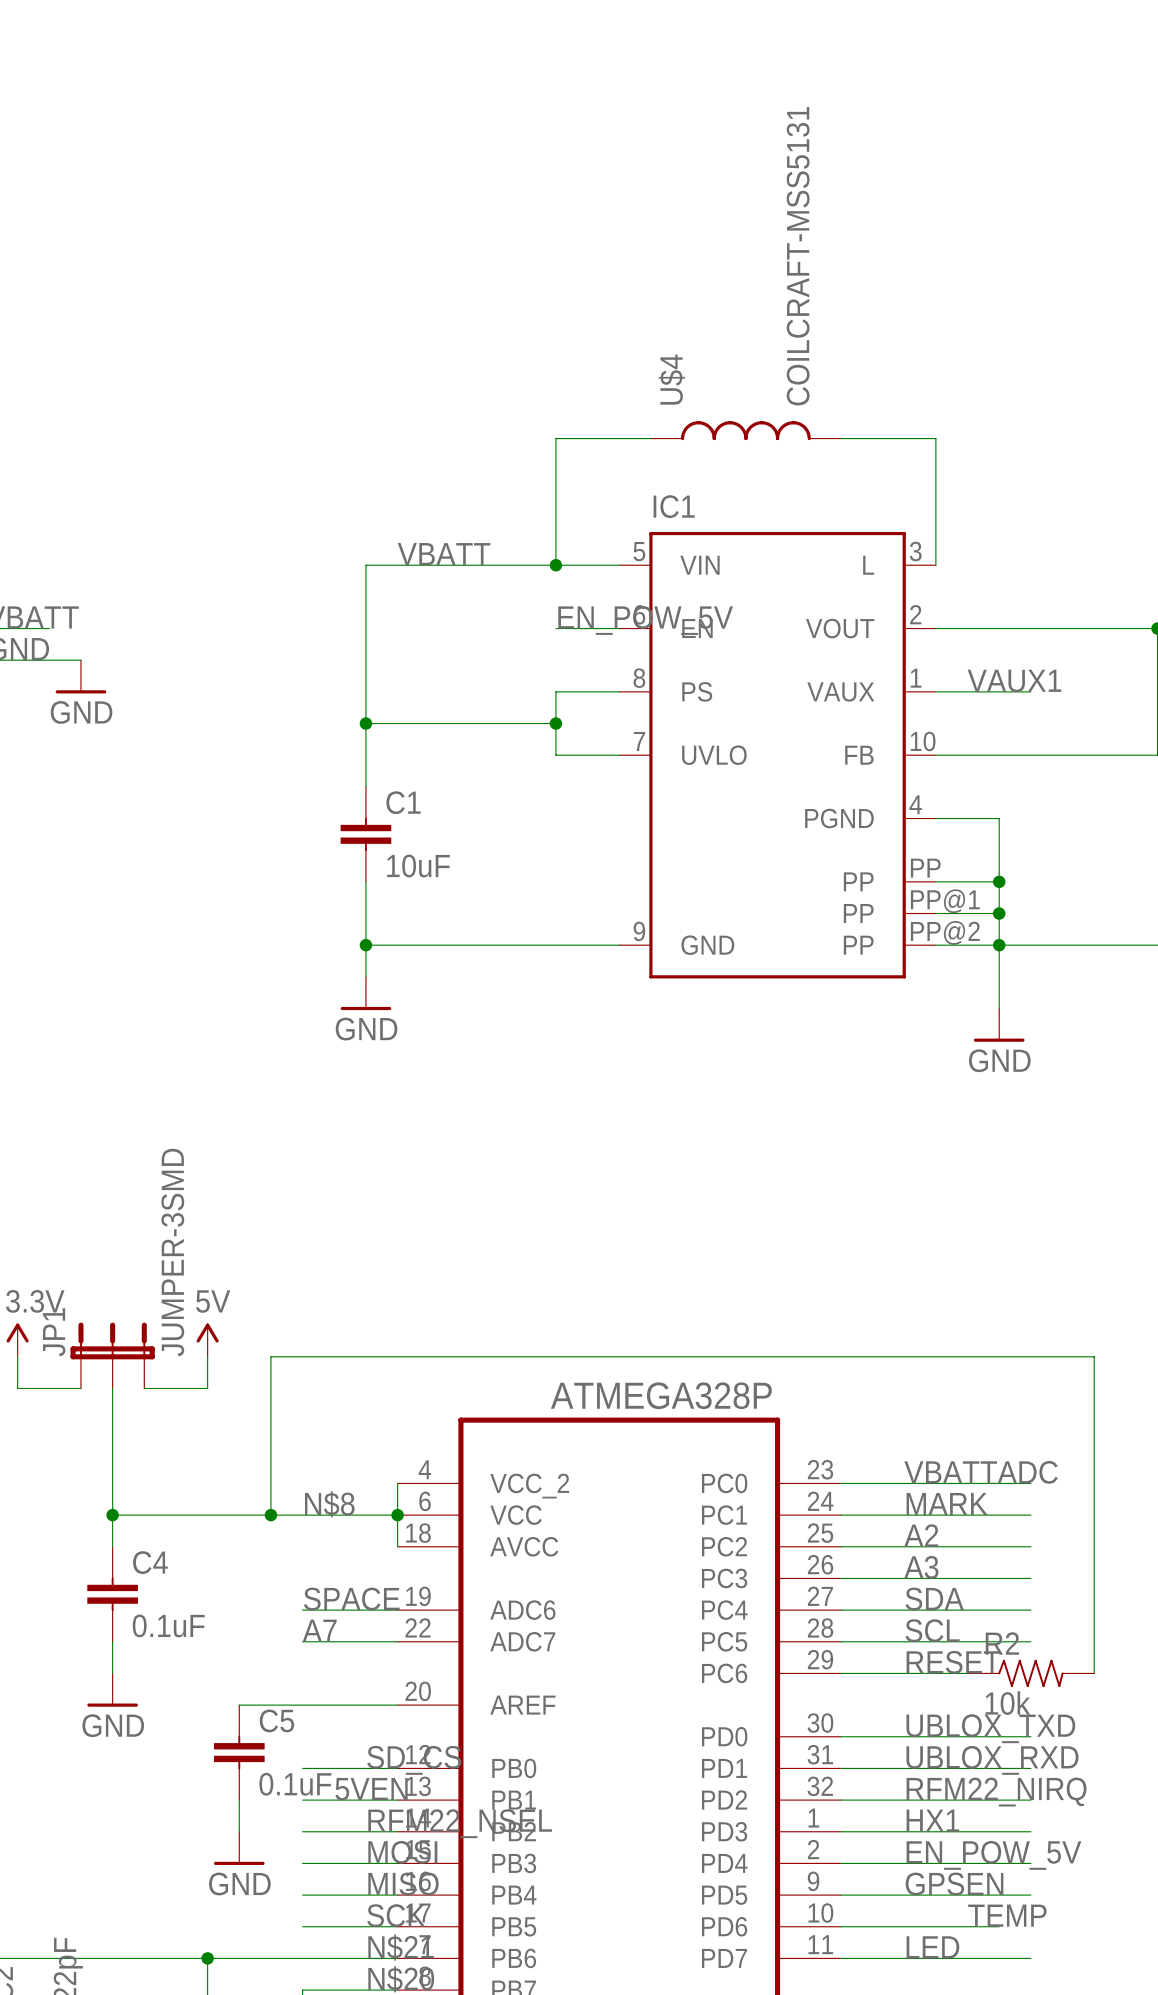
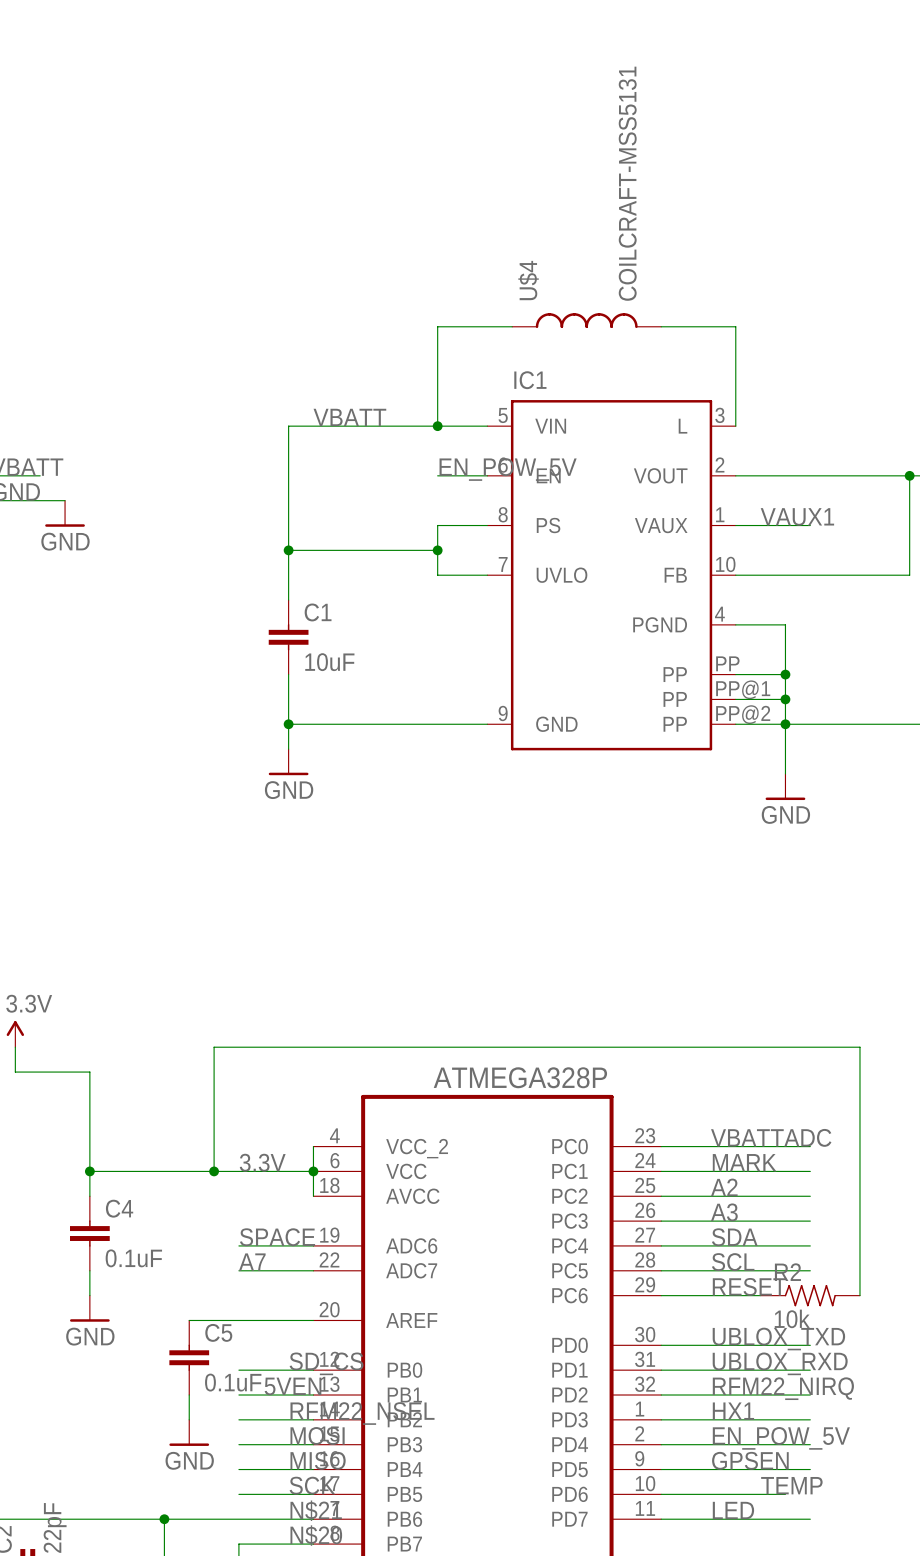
power symbol: 5V (207, 1340) -> none
JP1: JUMPER-3SMD (112, 1355) -> none
wire: (207, 1356) (207, 1388) (144, 1388) -> none
wire: none -> (65, 1072) (89, 1072)
label: N$8 (329, 1504) -> 3.3V (262, 1162)

